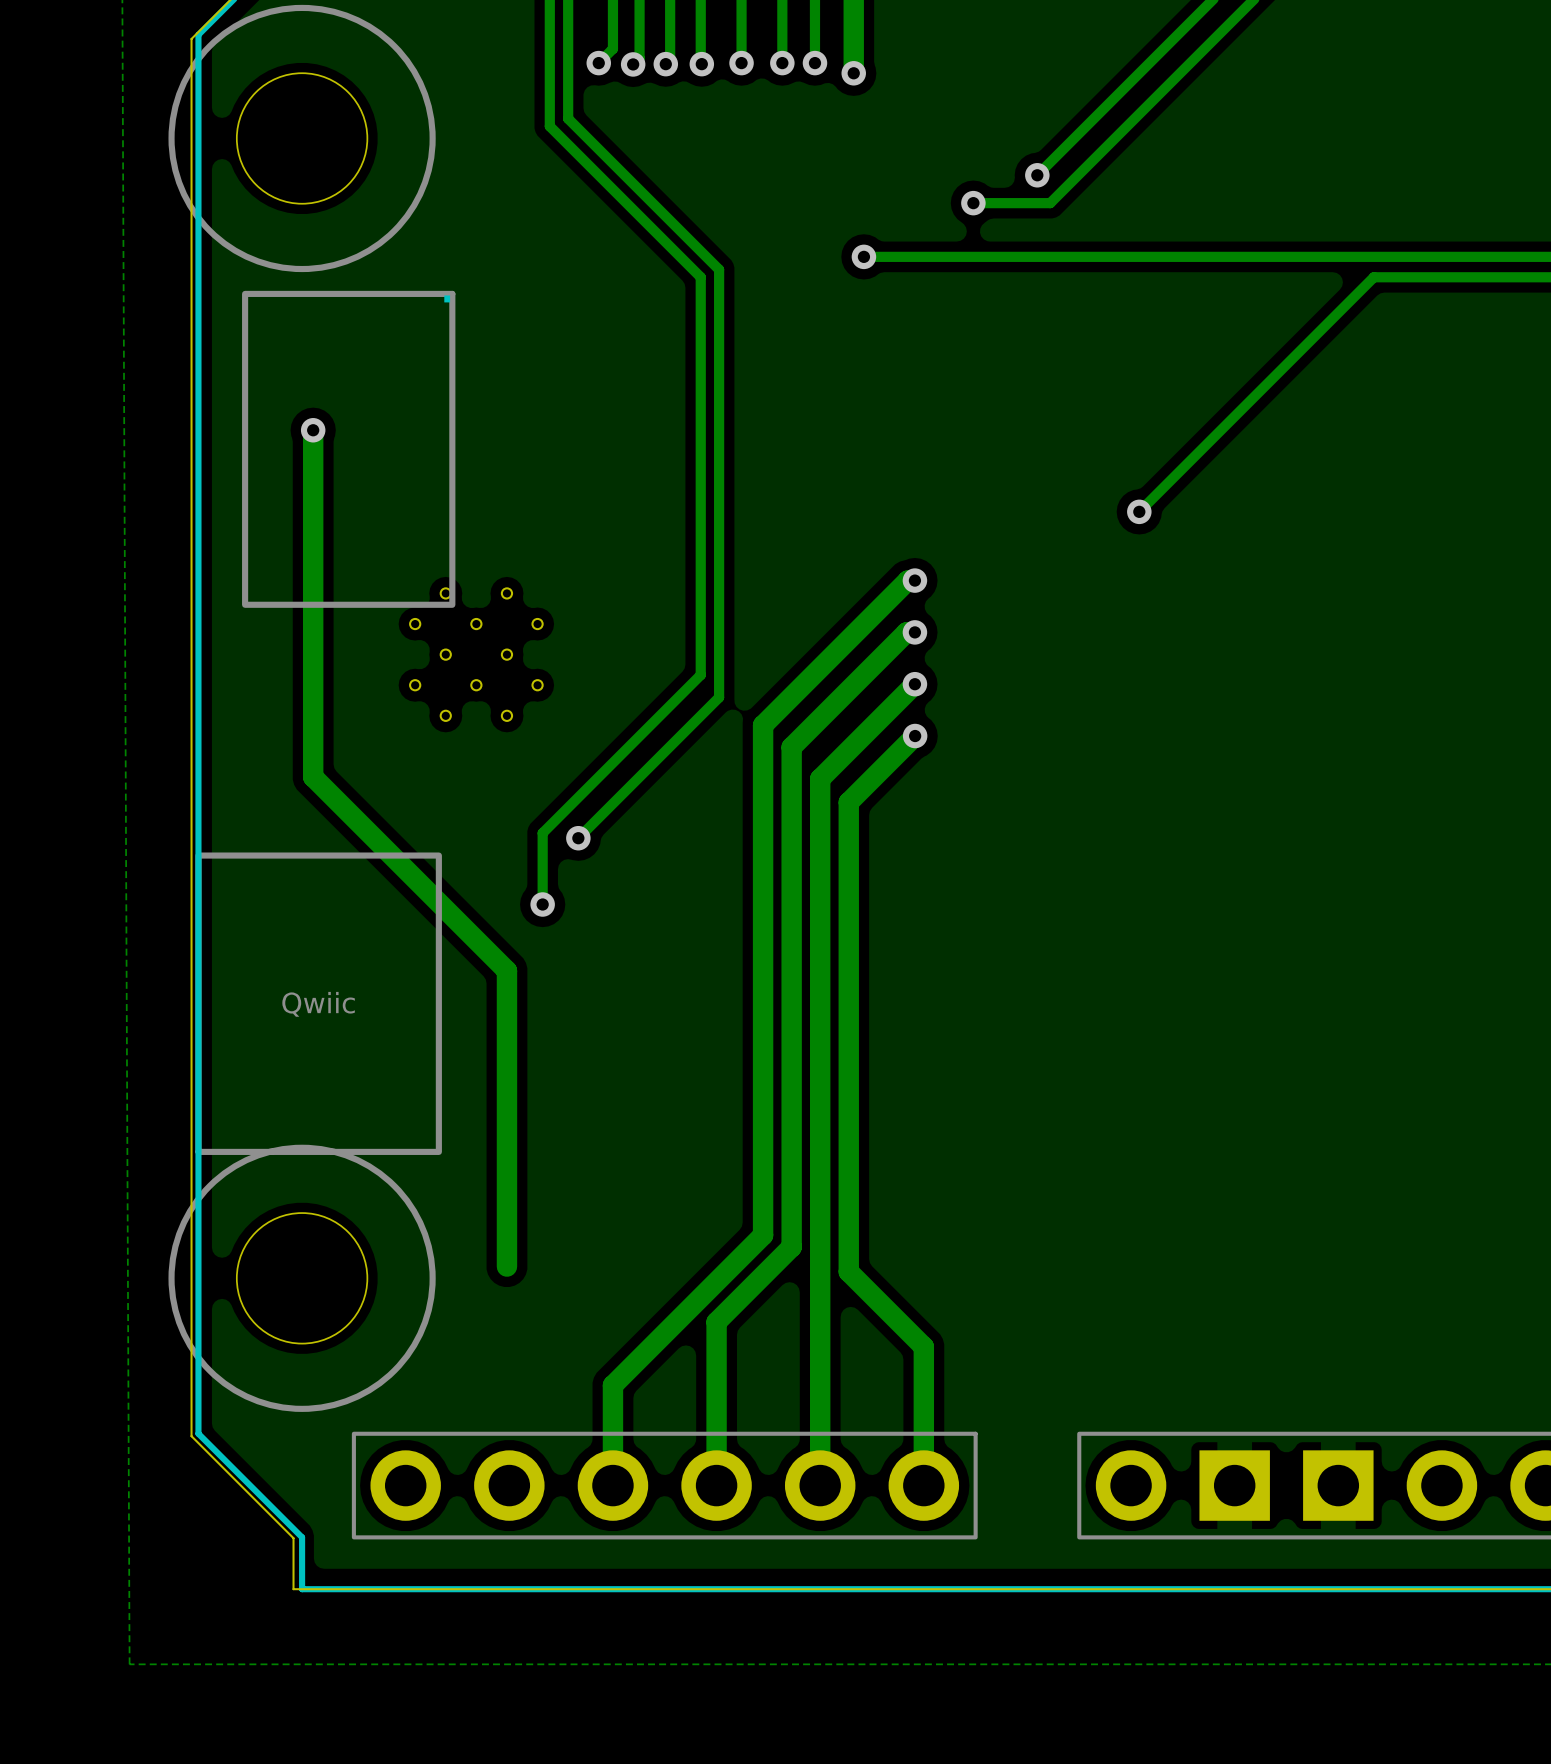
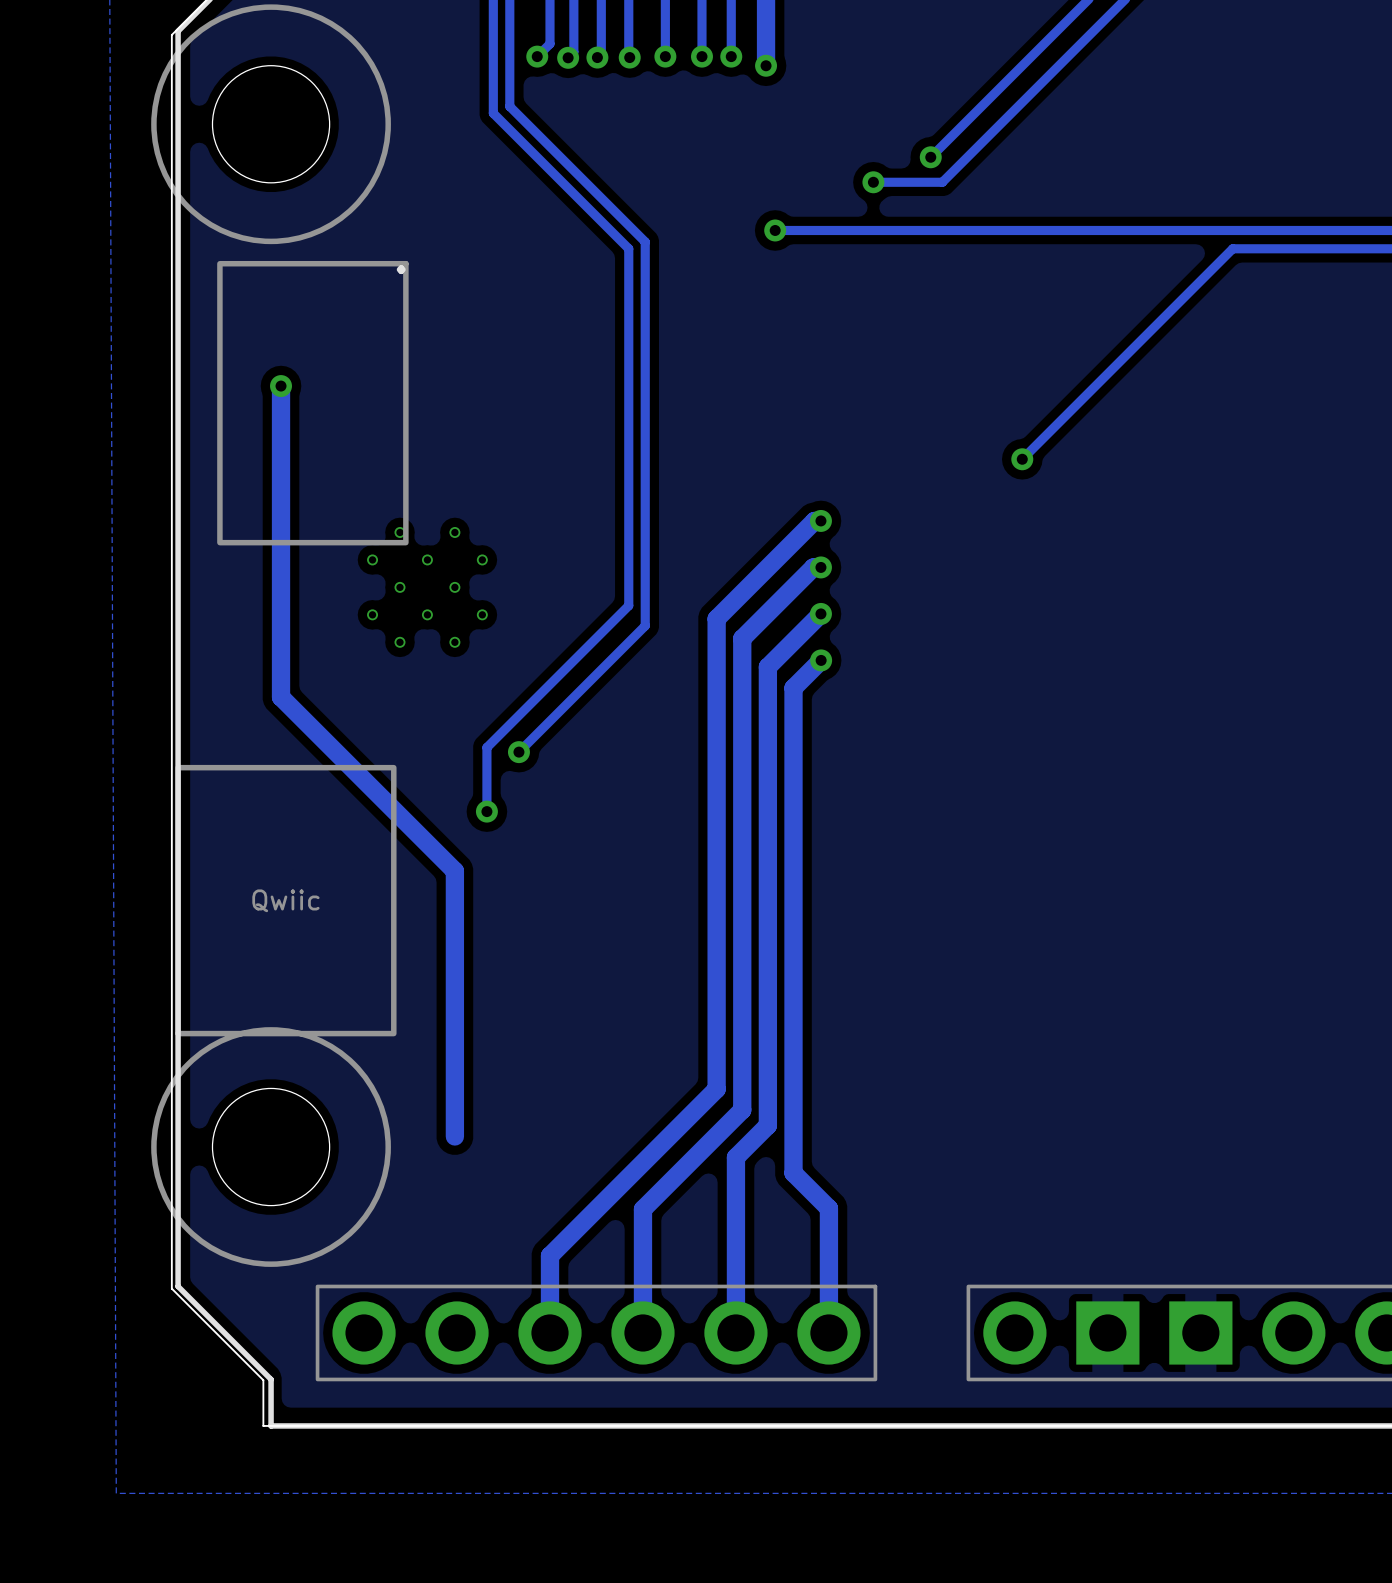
track: (798, 689) (763, 725) (763, 1235) (612, 1385) (612, 1399) -> (716, 618) (716, 1089) (549, 1255)
track: (827, 711) (791, 747) (791, 1247) (716, 1322) (716, 1347) -> (742, 638) (742, 1110) (642, 1209)
track: (855, 743) (820, 778) (820, 1289) -> (767, 667) (767, 1125) (735, 1157)
track: (884, 766) (848, 802) (848, 1271) (884, 1307) -> (793, 688) (793, 1173)

